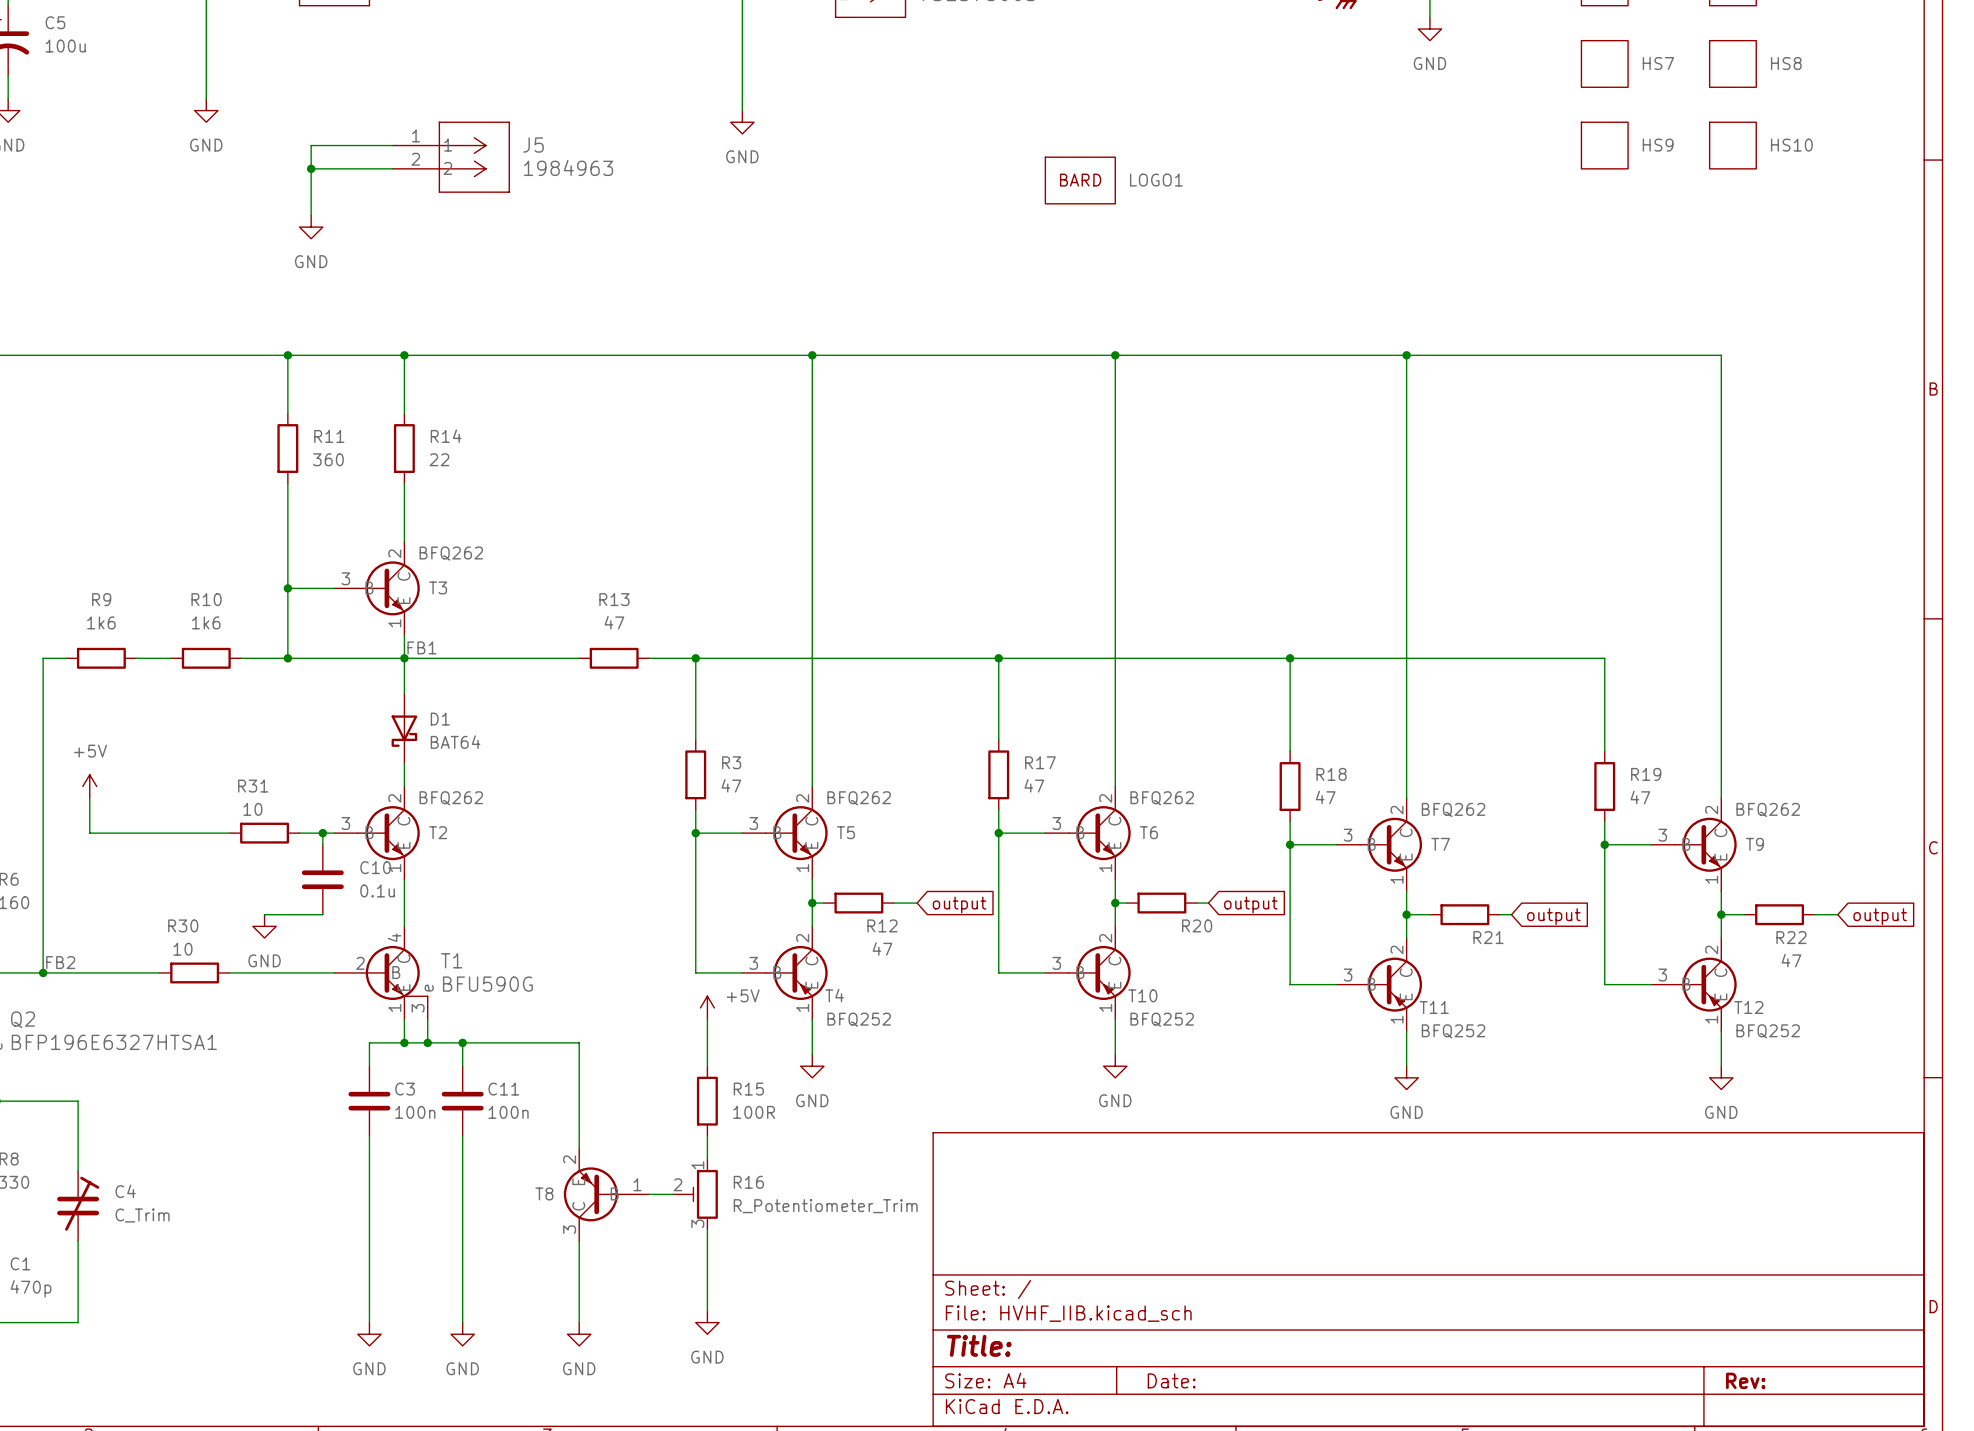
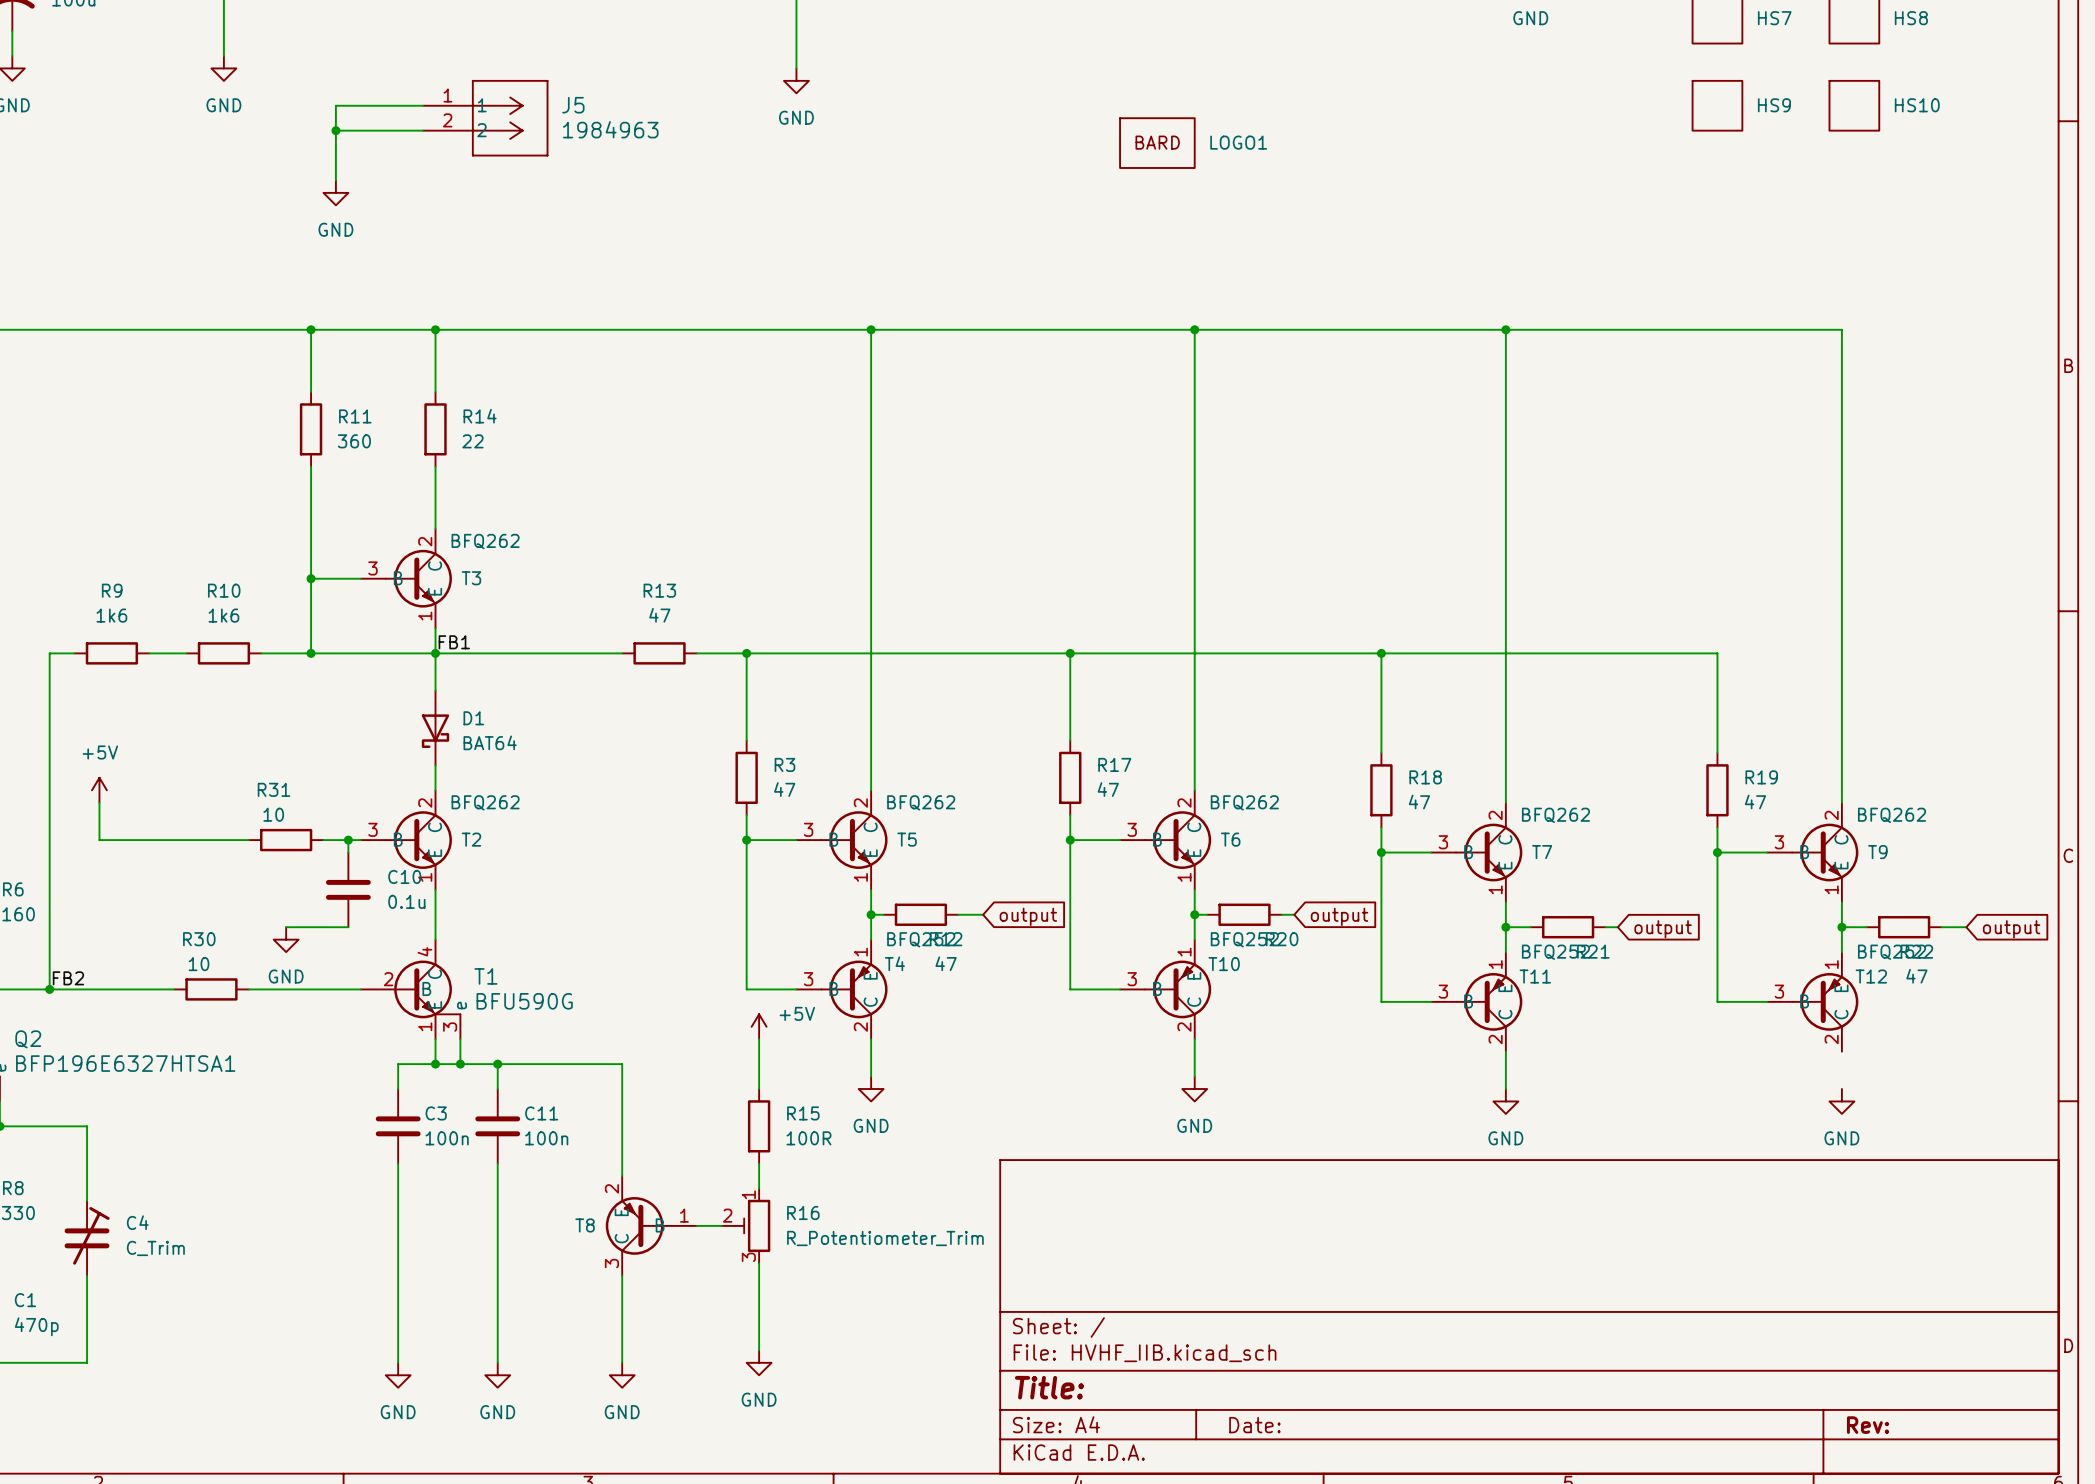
T4 flip: as is (796, 972) -> up-down (854, 989)
T10 flip: as is (1099, 972) -> up-down (1177, 989)
T11 flip: as is (1390, 984) -> up-down (1488, 1001)
T12 flip: as is (1705, 984) -> up-down (1824, 1001)
wire: (1721, 1031) (1721, 1066) -> none

